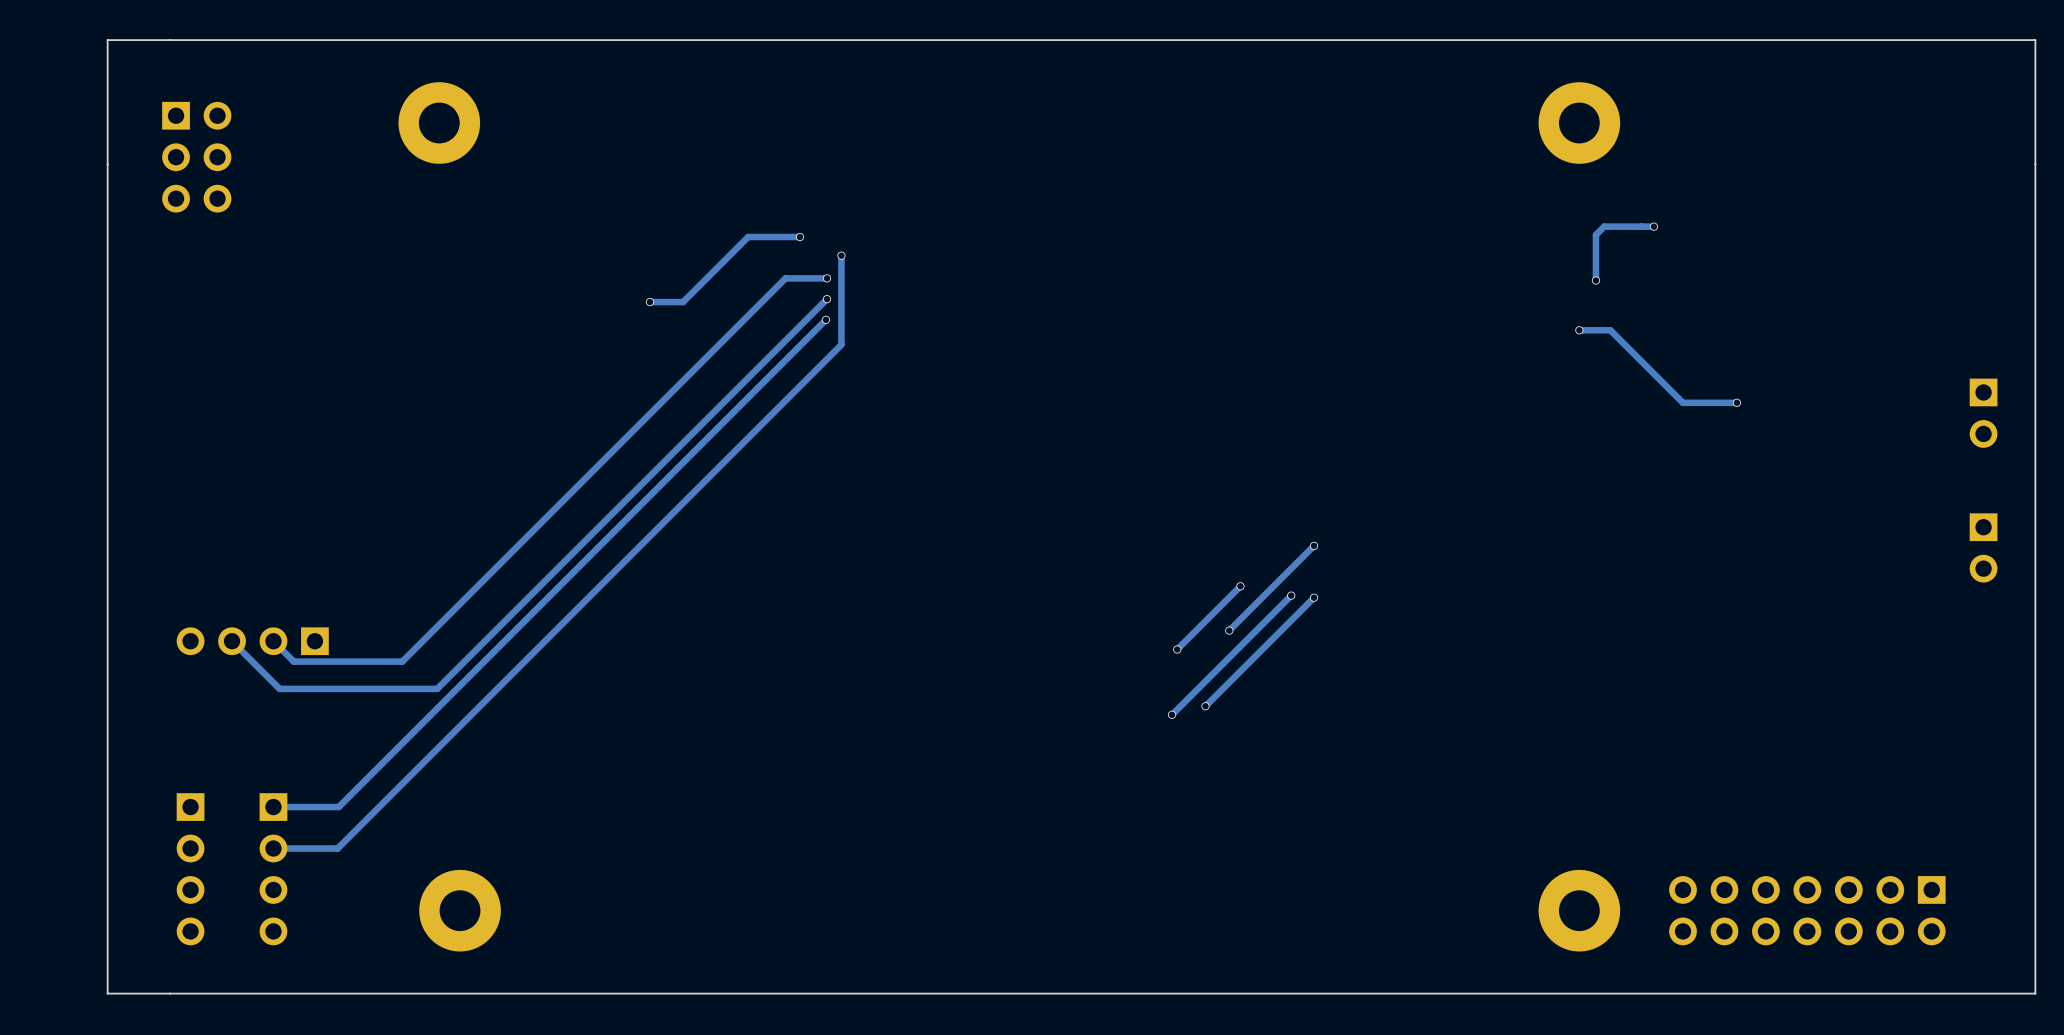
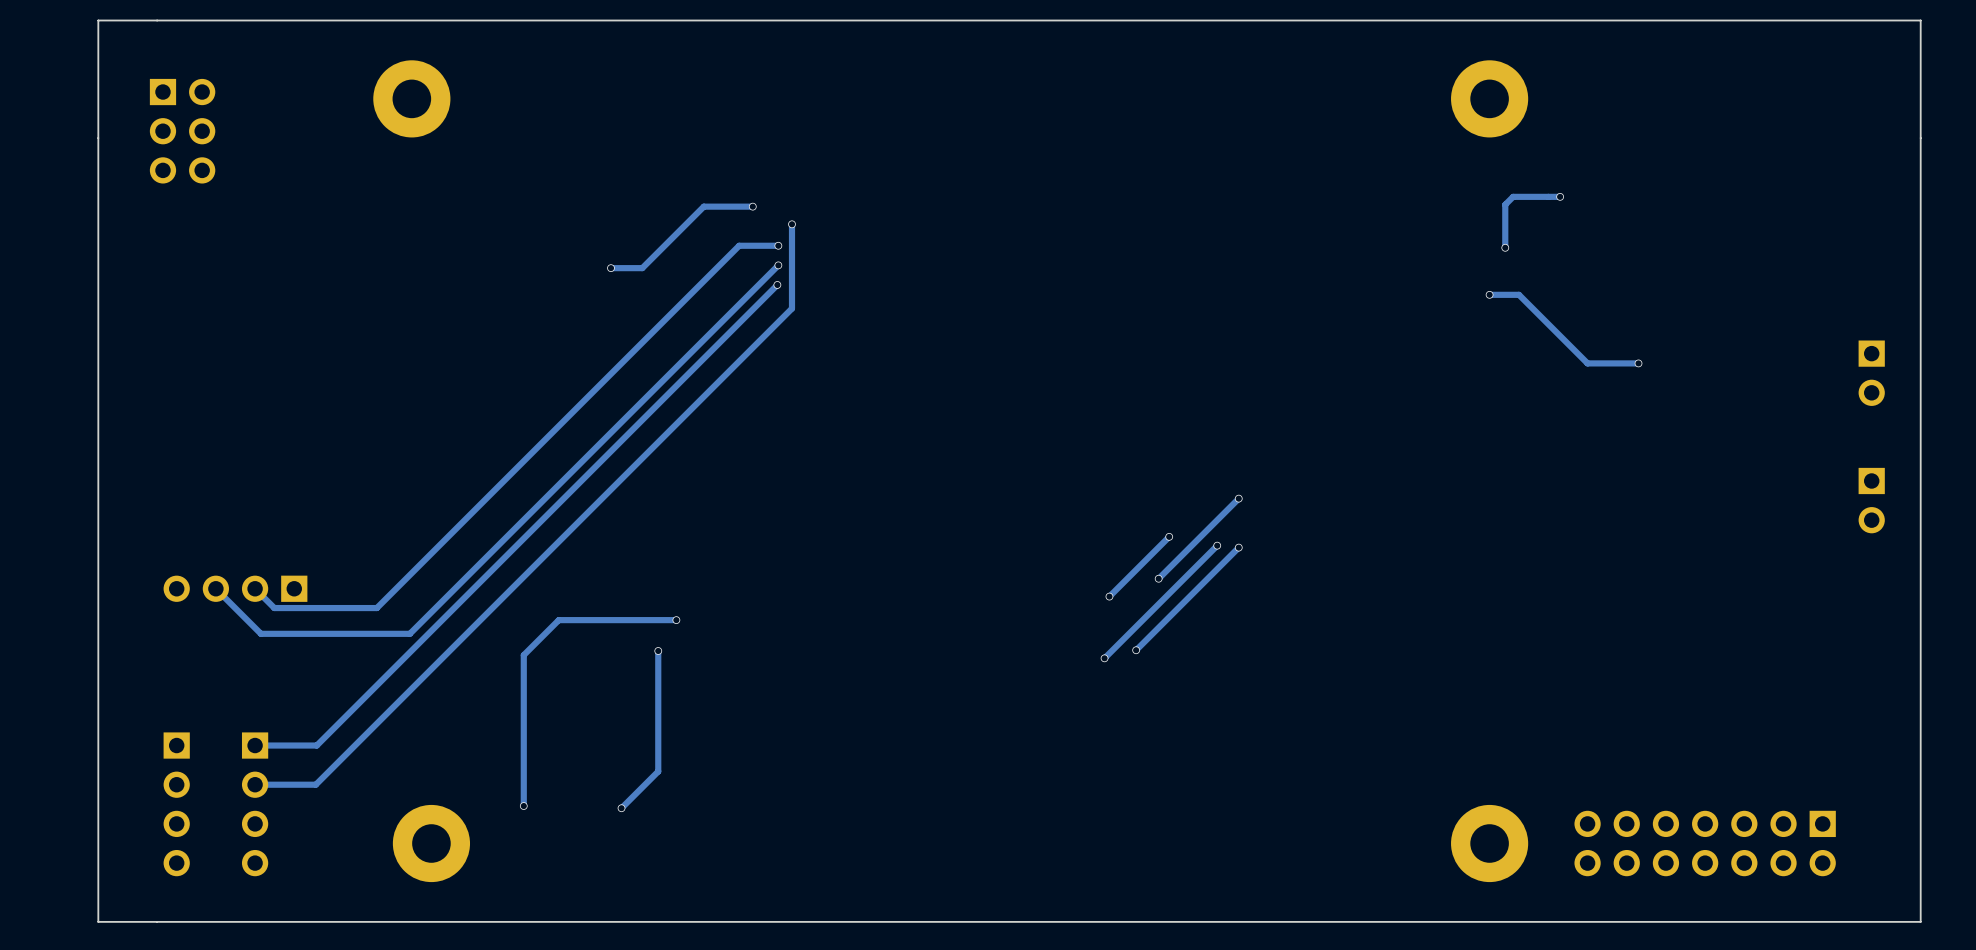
track: none -> (676, 620) (558, 620) (523, 655) (523, 806)
via: none -> (676, 620)
track: none -> (658, 650) (658, 771) (621, 808)
via: none -> (658, 650)
via: none -> (523, 806)
via: none -> (621, 808)

